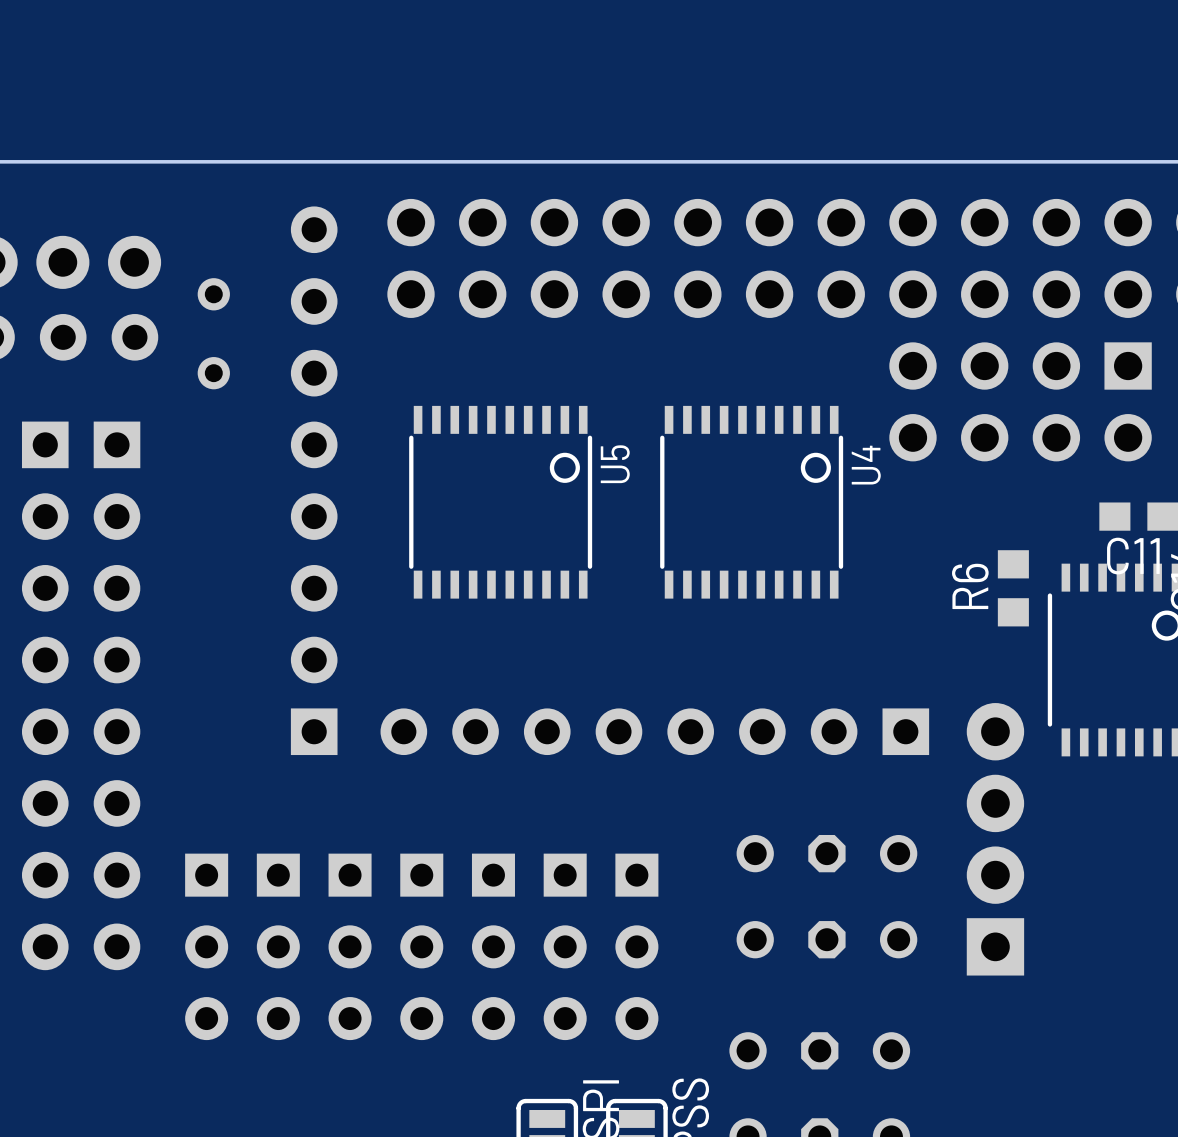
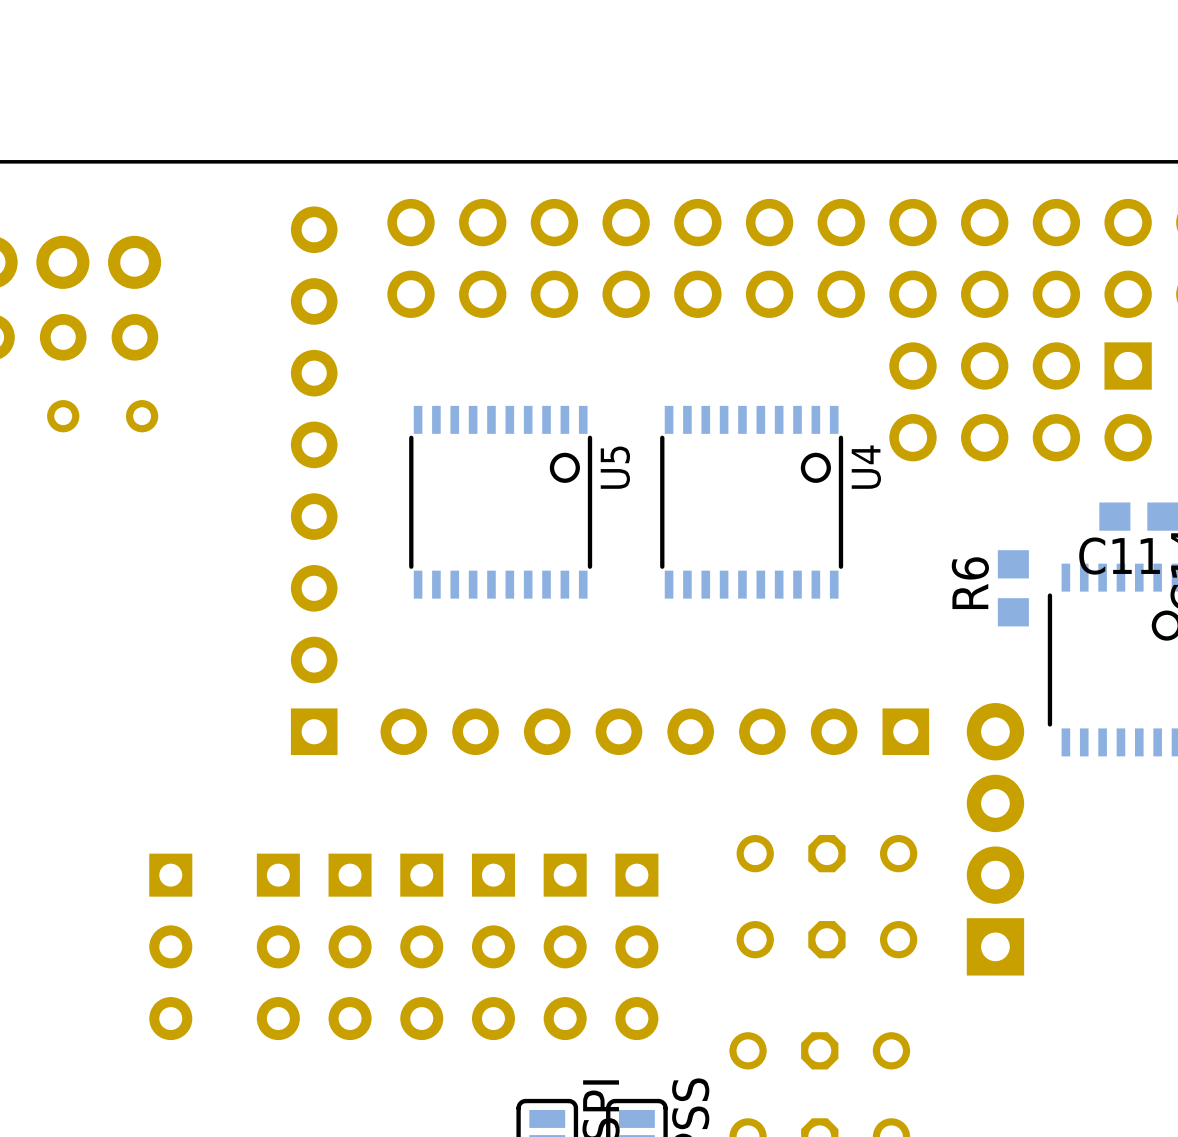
part rotation: 0° (213, 333) -> 90° clockwise (102, 416)
part position: (213, 333) -> (102, 416)
part: (45, 695) -> none
part: (116, 695) -> none
part position: (206, 946) -> (170, 946)

